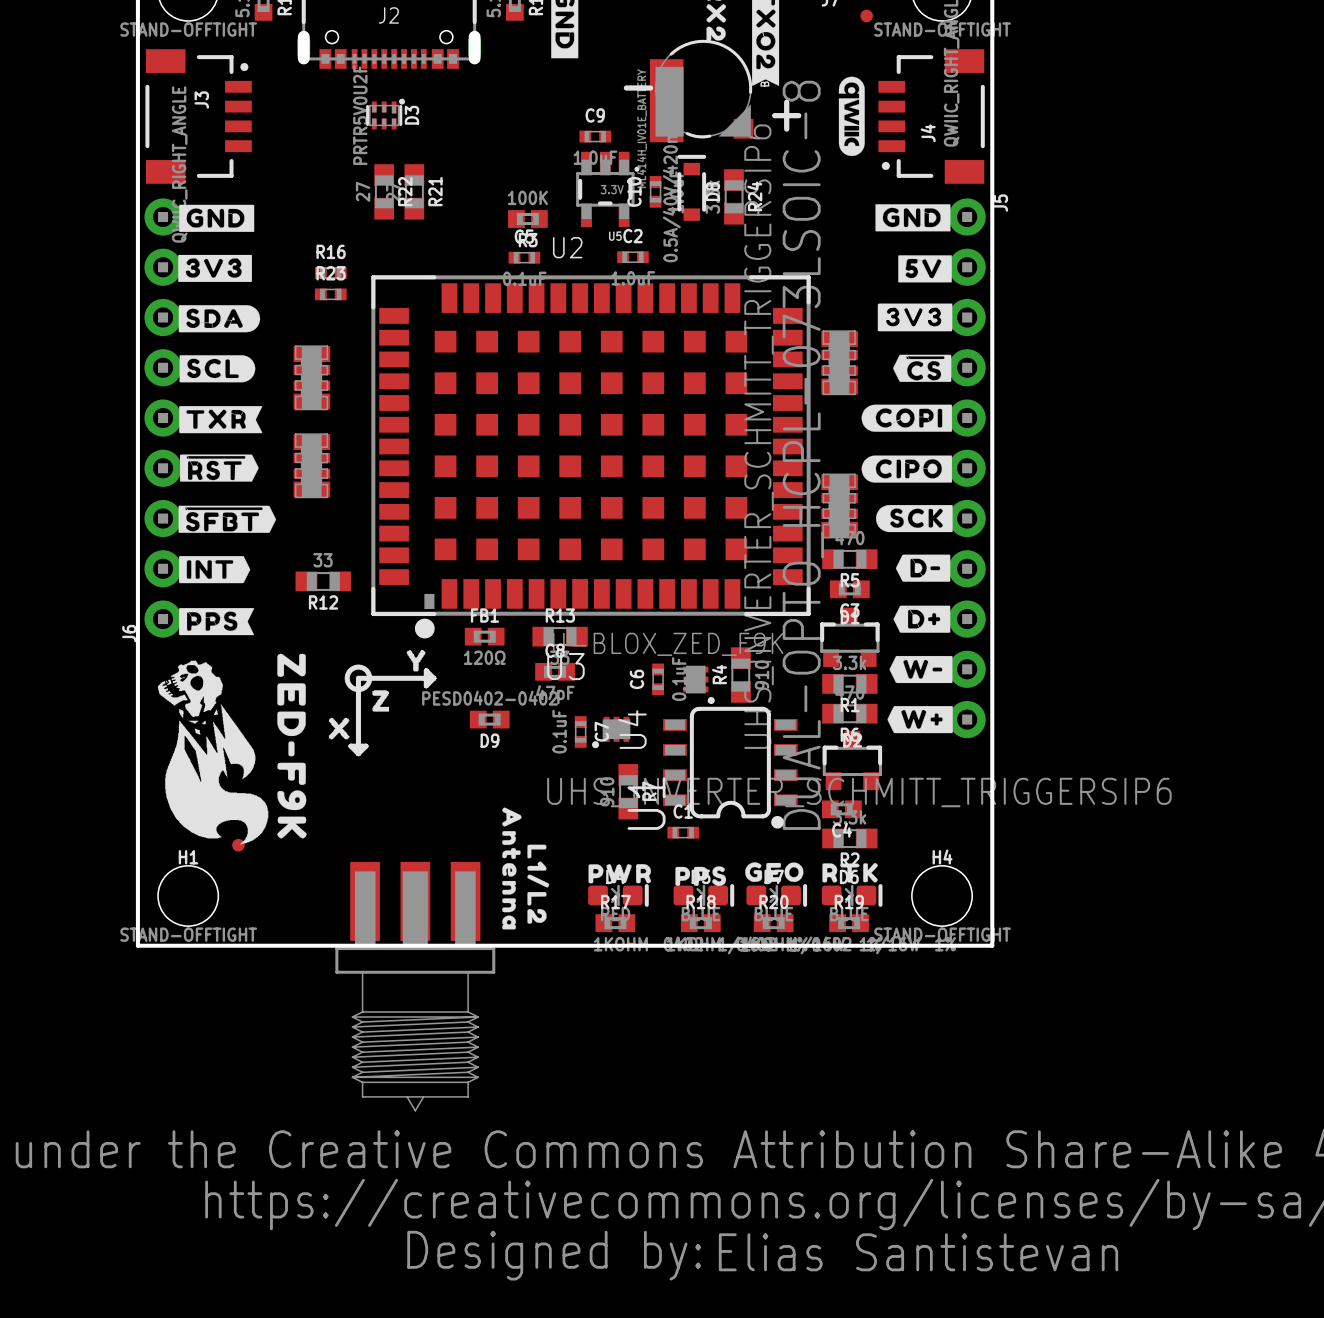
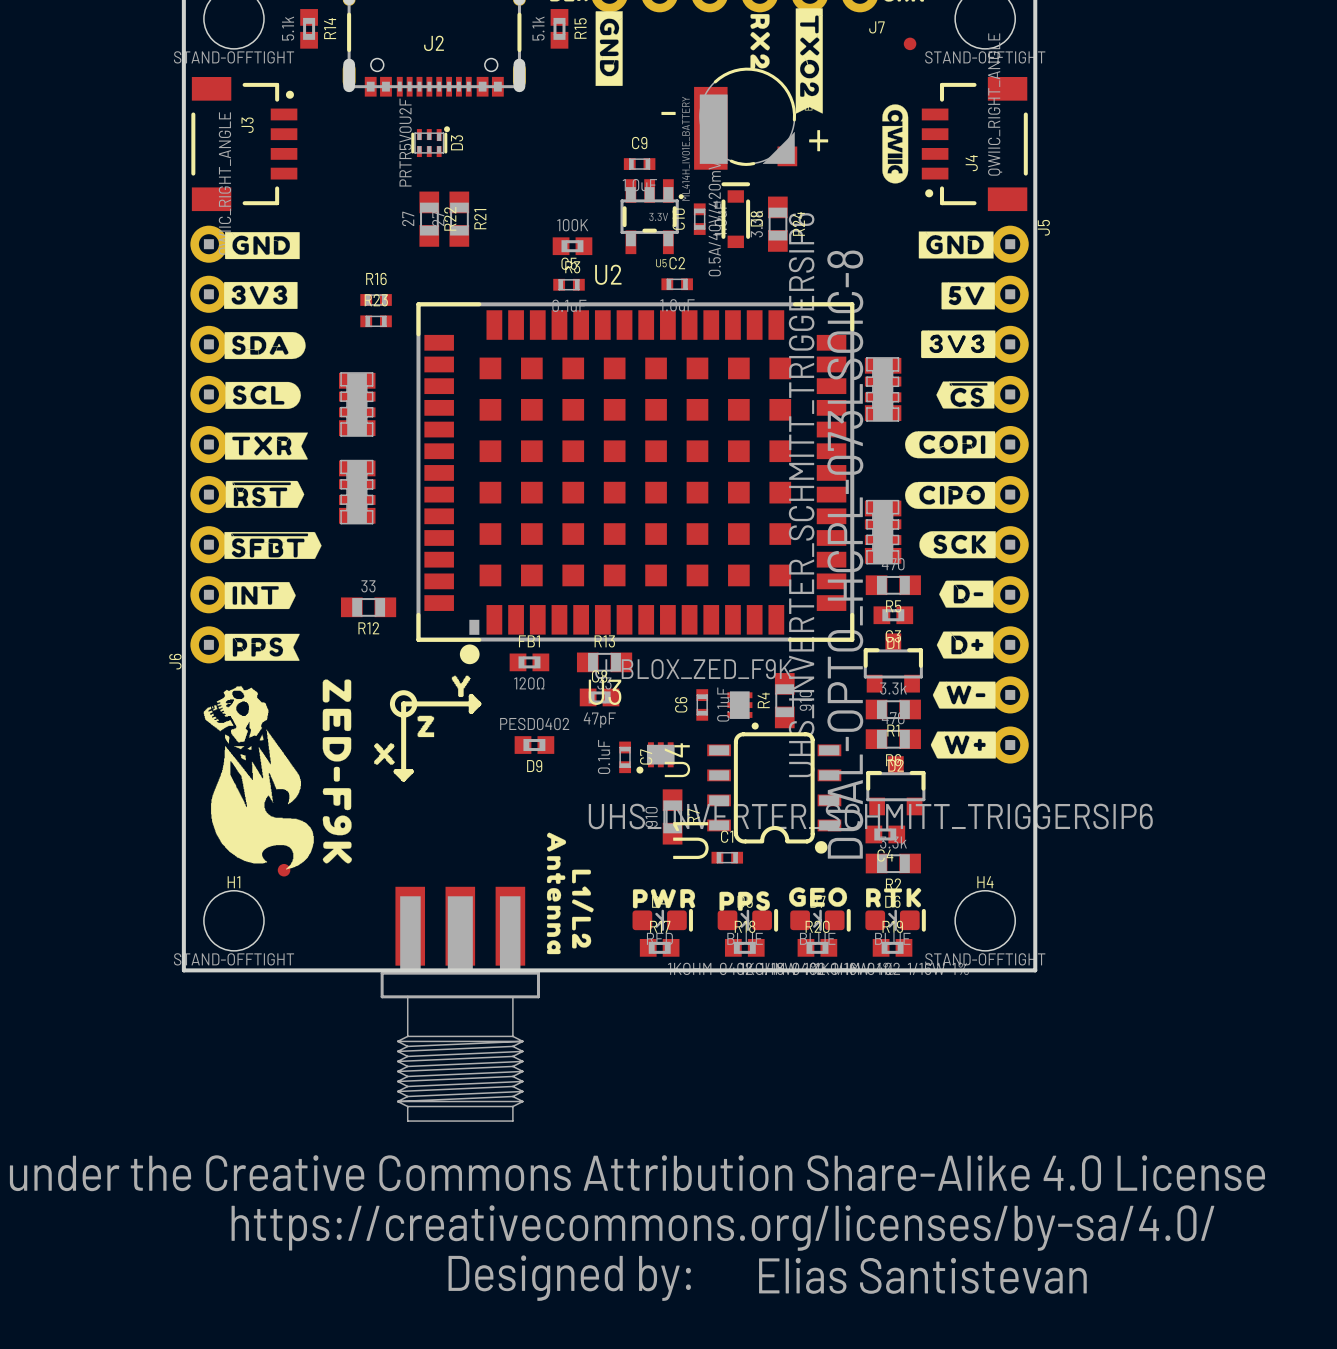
D9 value: PESD0402-0402 (489, 698) -> PESD0402 (534, 723)
part footprint: [335, 861, 496, 1112] -> [380, 886, 540, 1122]

